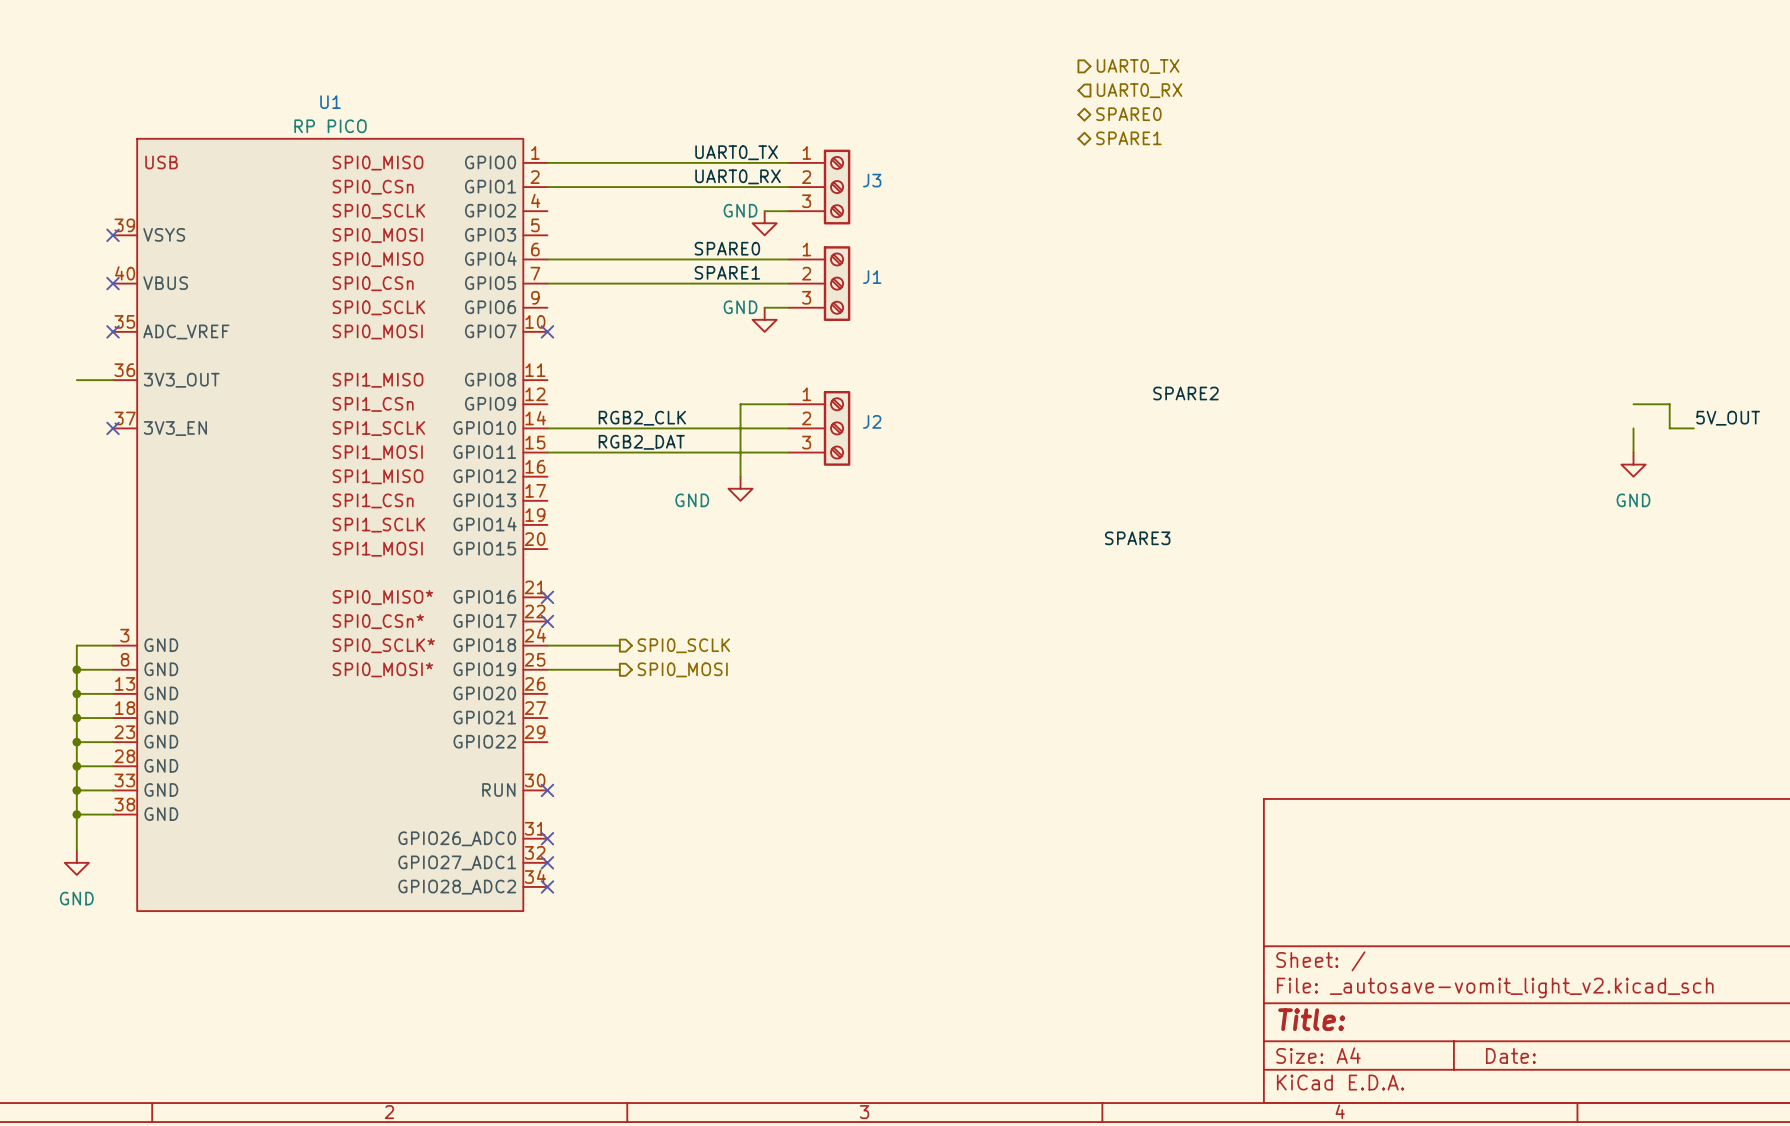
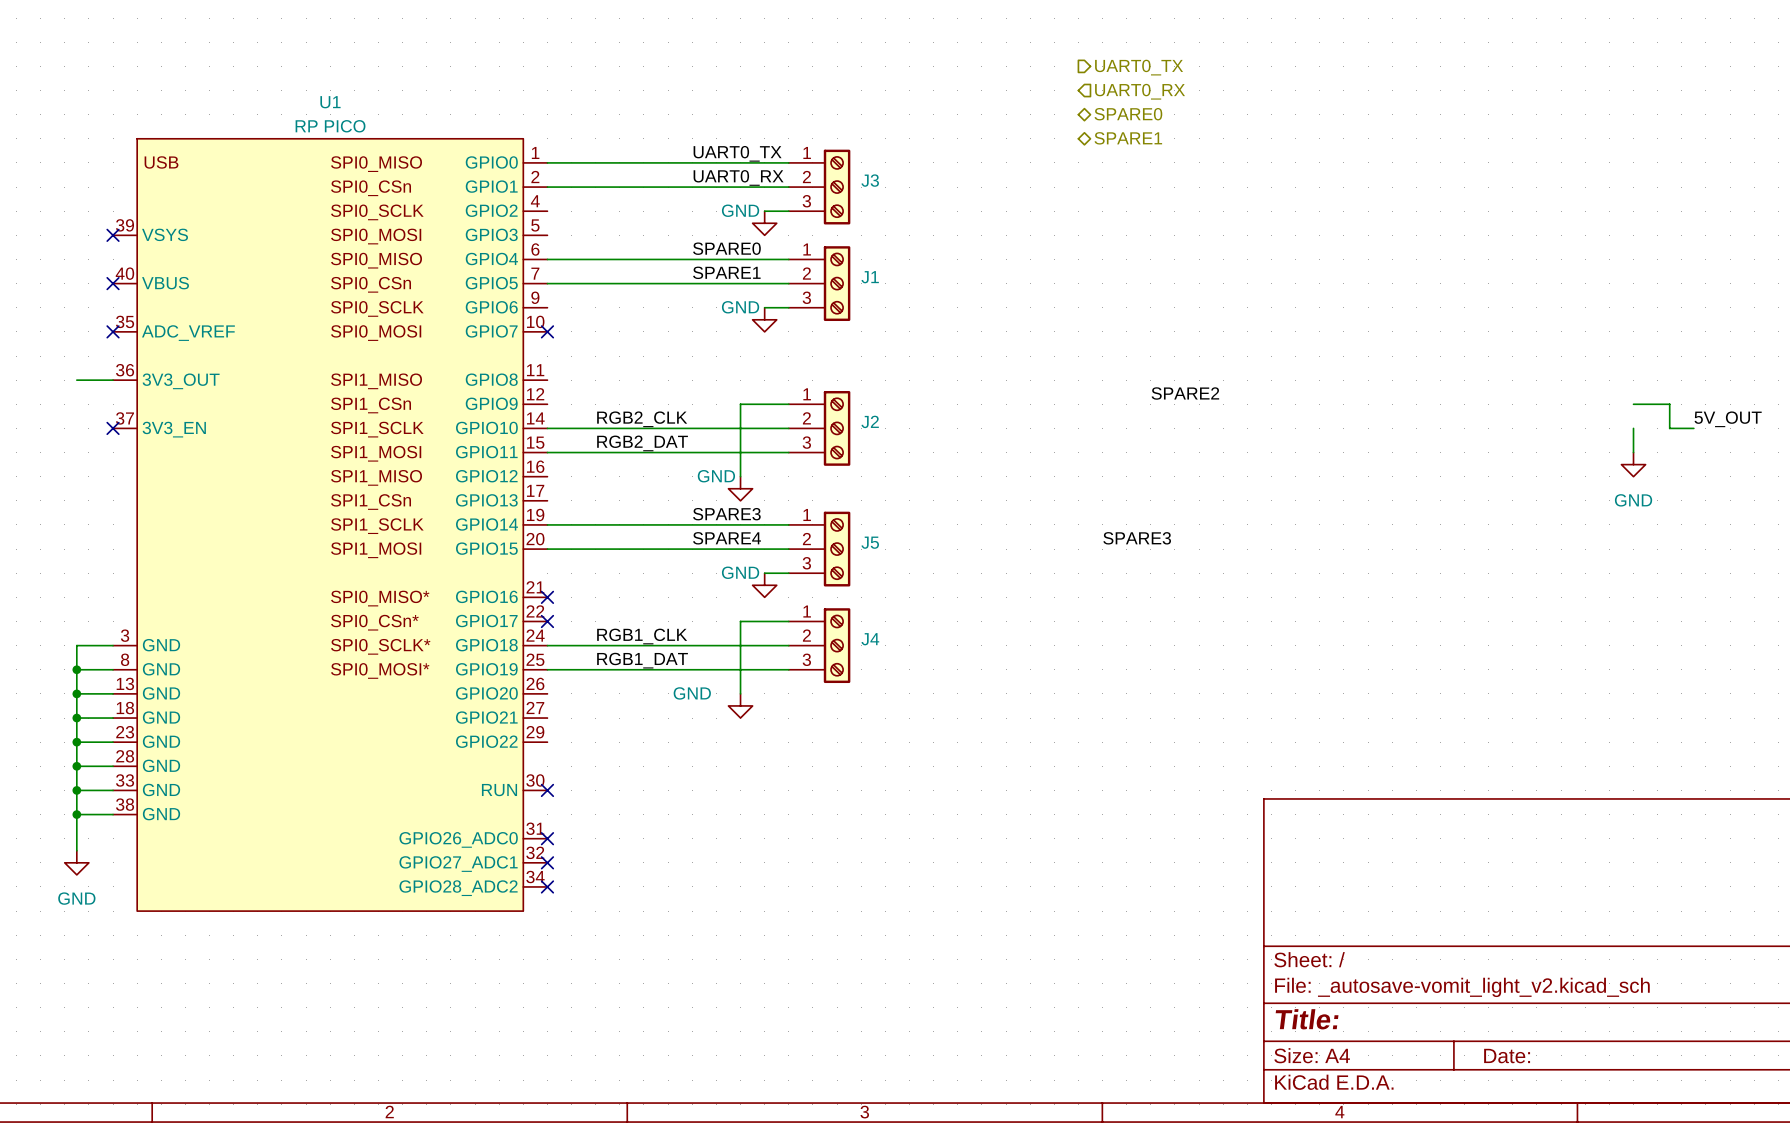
power symbol text position: GND (692, 500) -> GND (716, 476)
label: none -> SPARE3 (726, 514)
wire: none -> (547, 524) (788, 524)
label: none -> SPARE4 (727, 538)
wire: none -> (547, 549) (788, 549)
J5: none -> (819, 549)
wire: none -> (764, 573) (788, 573)
power symbol: none -> GND (764, 585)
wire: none -> (788, 621) (740, 621) (740, 693)
label: none -> RGB1_CLK (642, 636)
wire: none -> (619, 645) (788, 645)
hierarchical label: SPI0_SCLK (683, 645) -> none
J4: none -> (819, 645)
label: none -> RGB1_DAT (642, 660)
wire: none -> (619, 669) (788, 669)
hierarchical label: SPI0_MOSI (682, 669) -> none
power symbol: none -> GND (740, 705)

